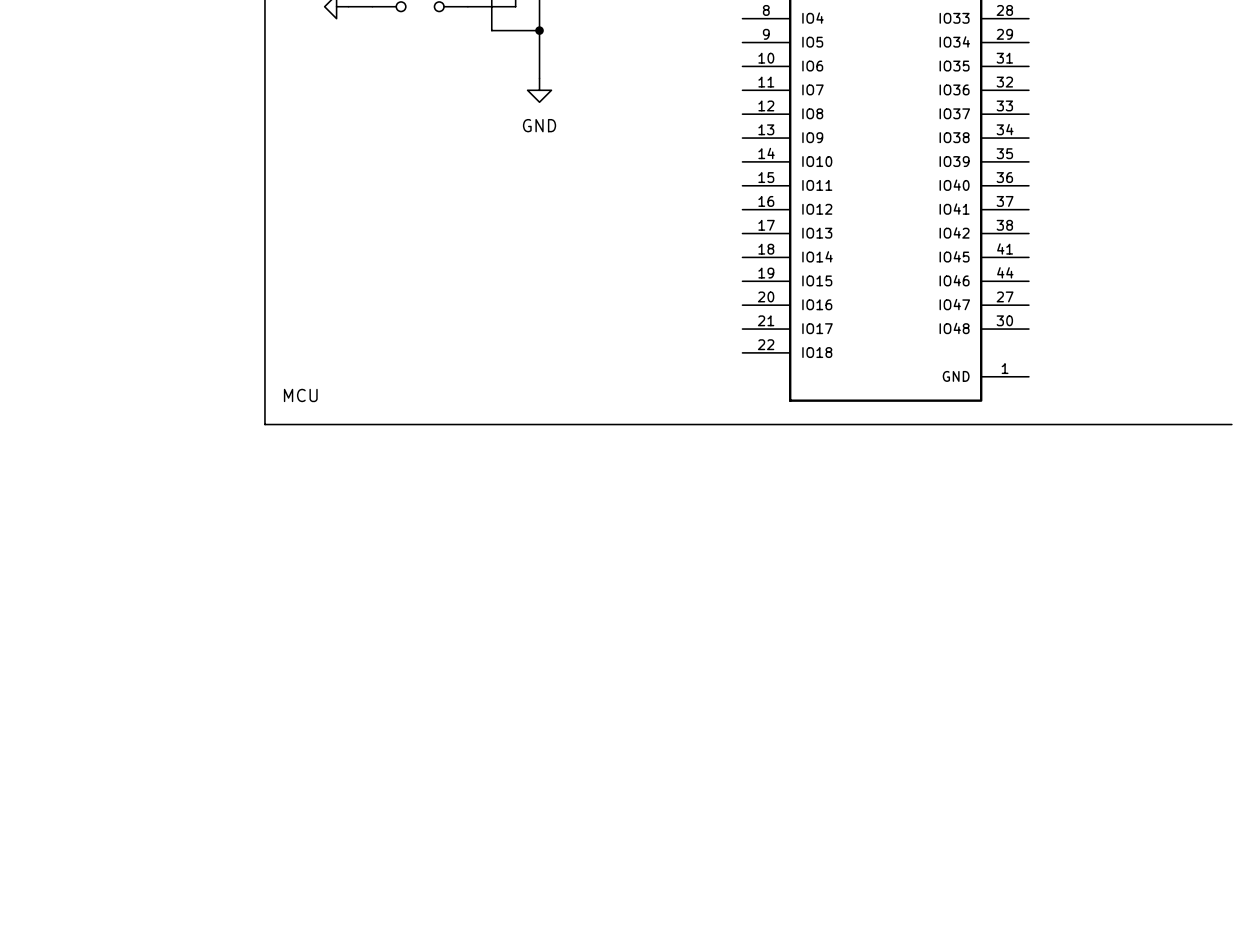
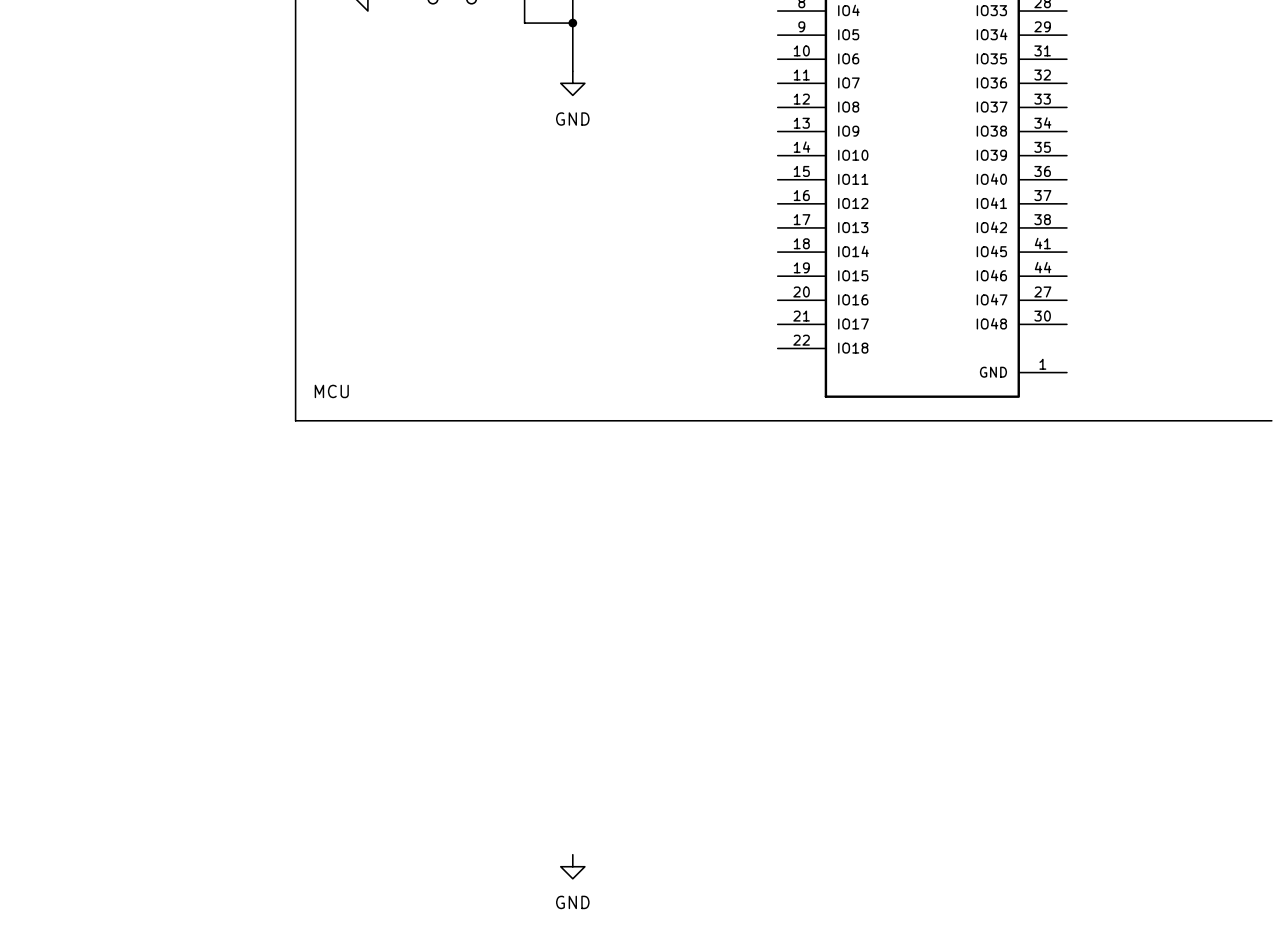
power symbol: none -> GND (572, 866)

